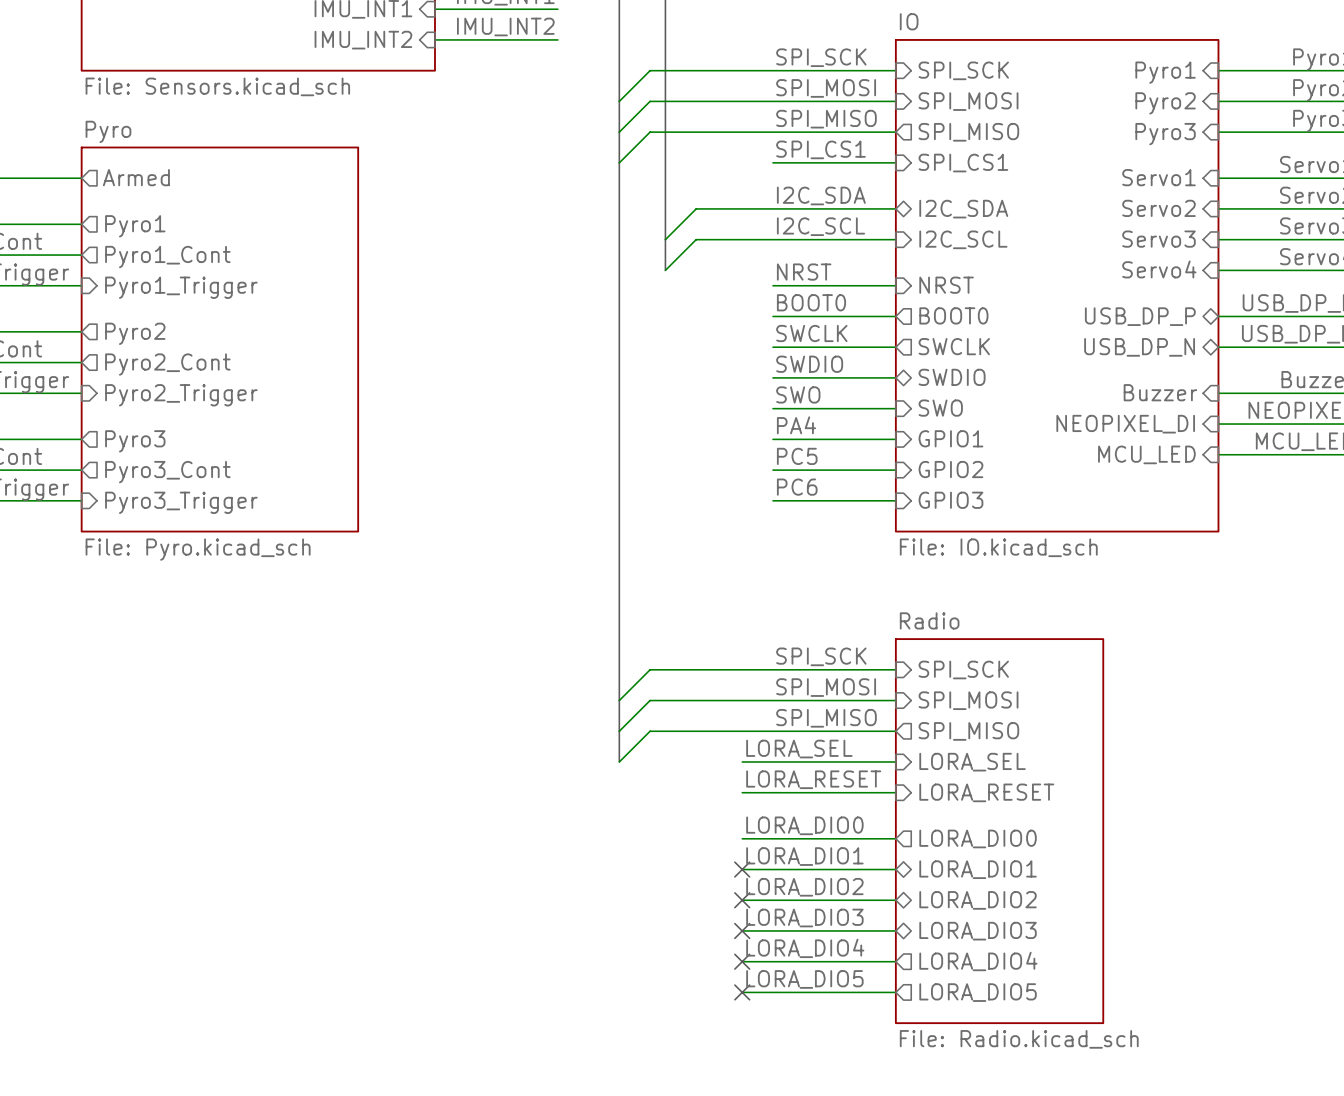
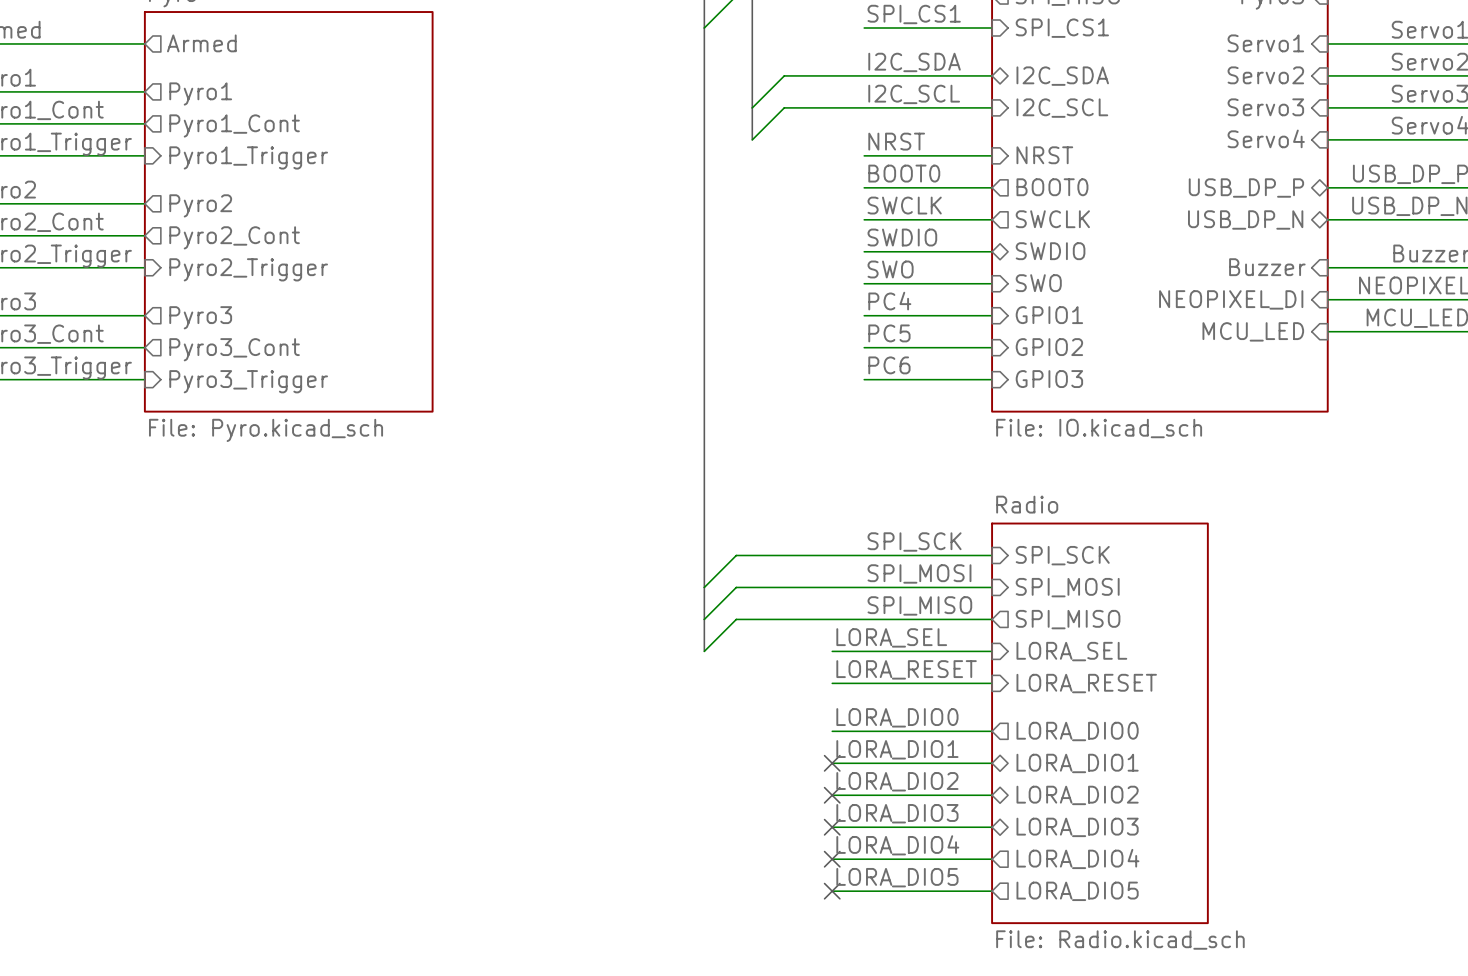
label: PA4 (796, 425) -> PC4 (889, 301)

